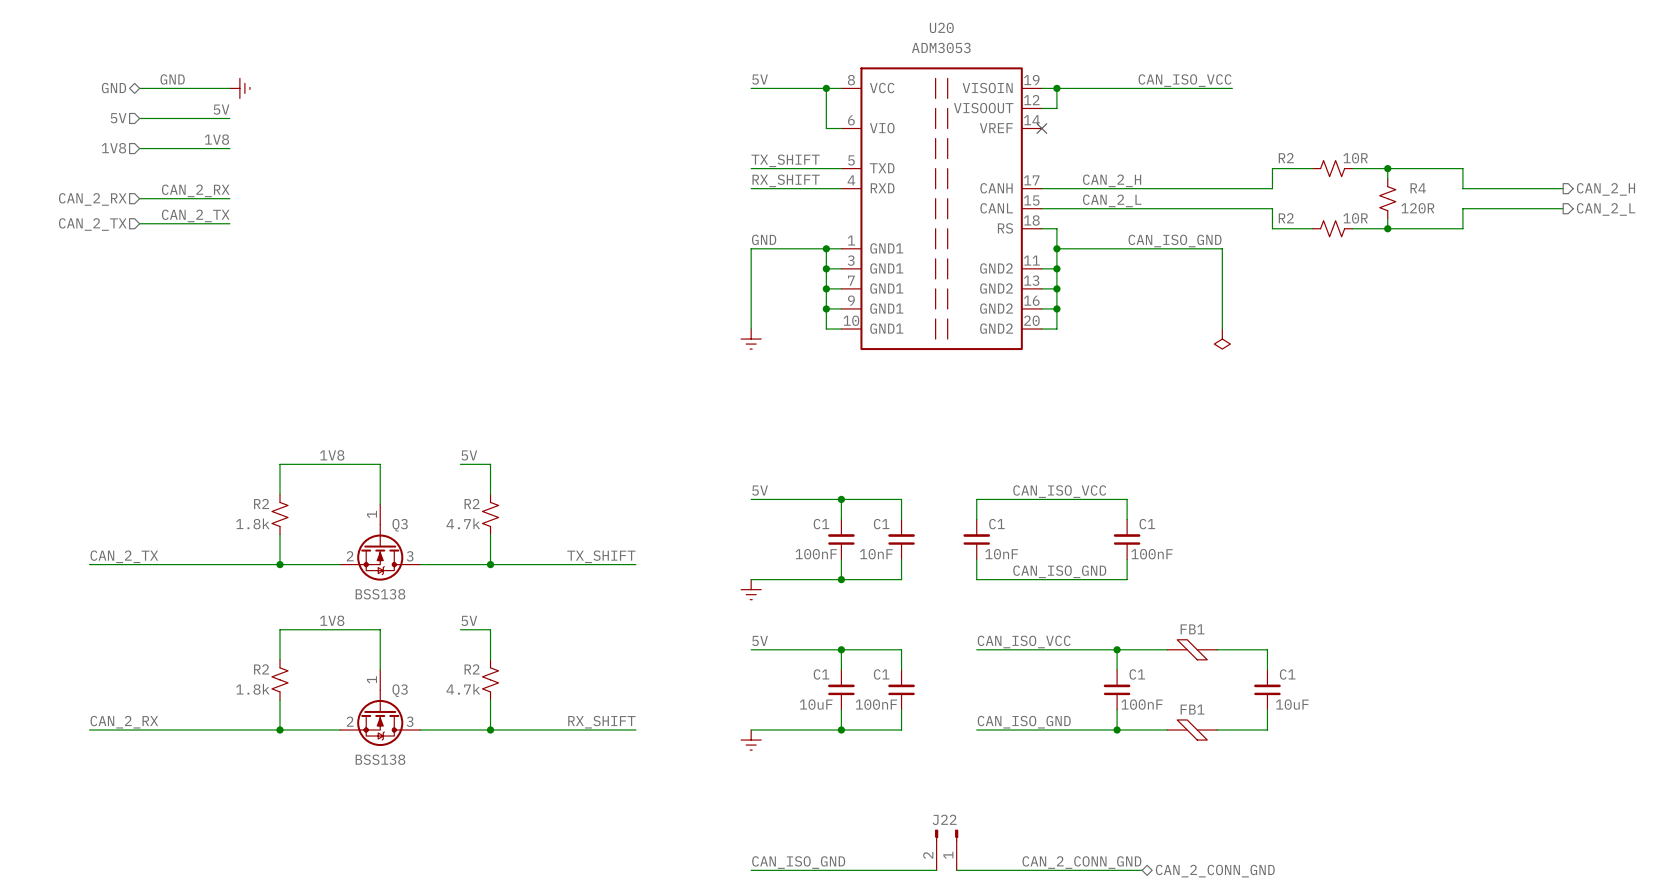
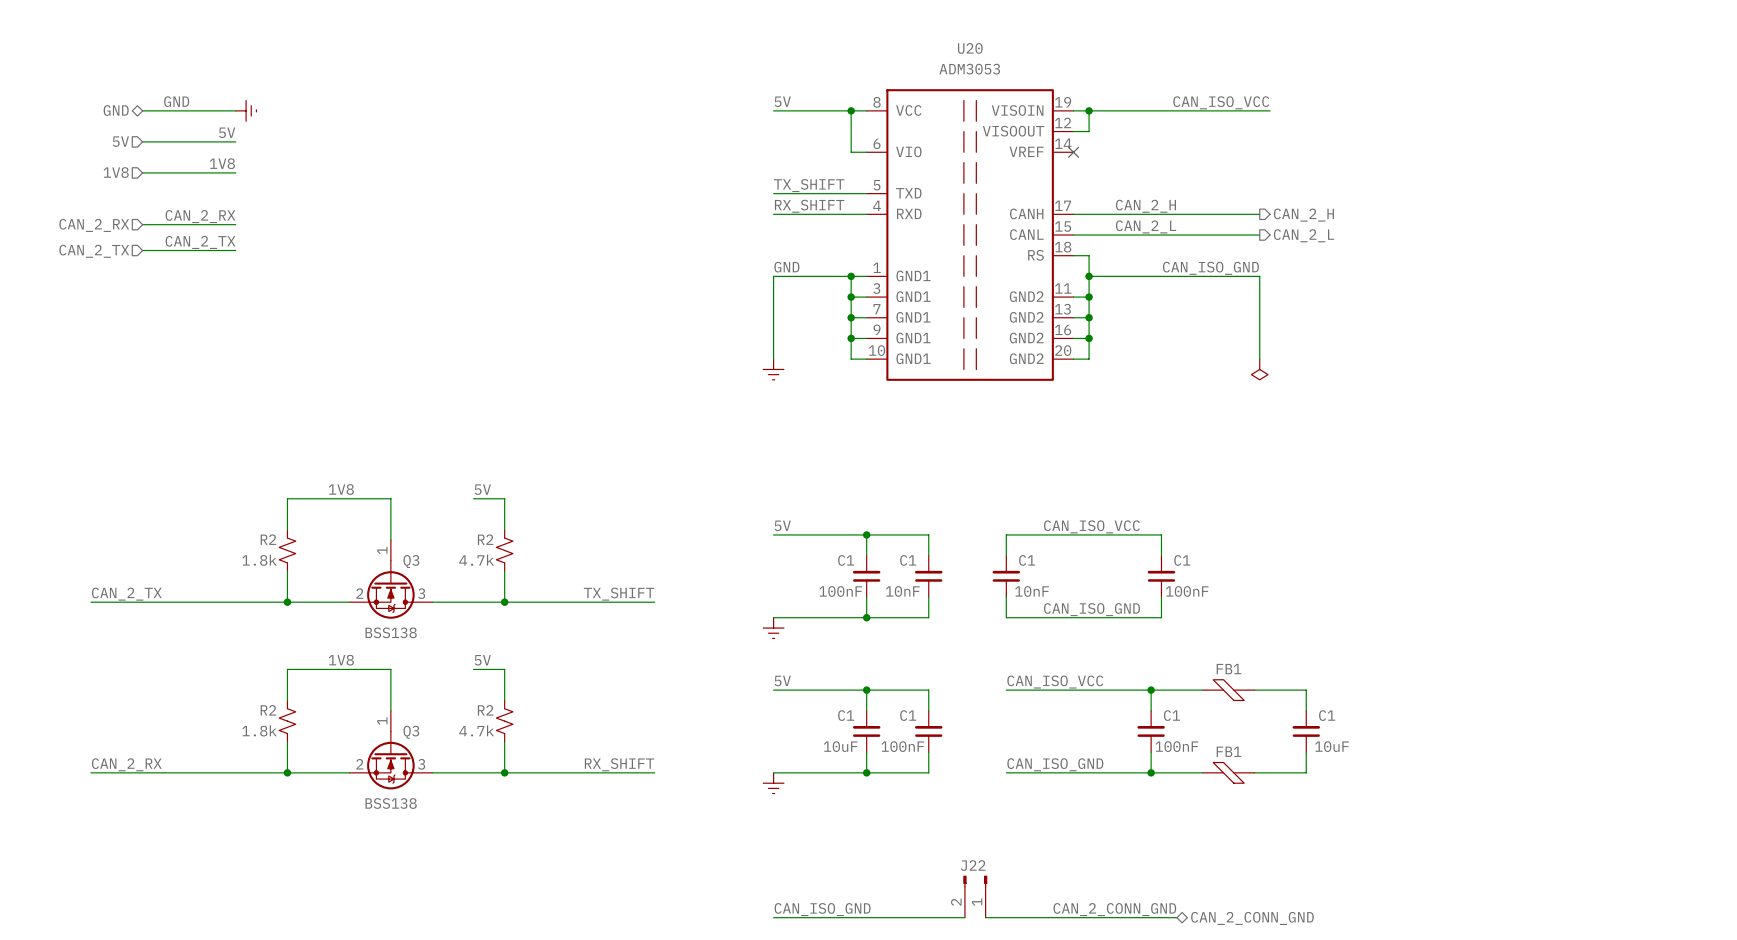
wire: (1312, 168) (1272, 168) (1272, 188) (1222, 188) -> none
R2: 10R (1332, 168) -> none
wire: (1352, 168) (1462, 168) (1462, 188) (1563, 188) -> none
wire: (1387, 168) (1387, 178) -> none
junction: (1387, 168) -> none
hierarchical label: none -> CAN_2_H (1303, 215)
hierarchical label: CAN_2_H (1606, 189) -> none
R4: 120R (1387, 198) -> none
wire: (1222, 208) (1272, 208) (1272, 228) (1312, 228) -> none
wire: (1563, 208) (1462, 208) (1462, 228) (1352, 228) -> none
hierarchical label: none -> CAN_2_L (1304, 235)
hierarchical label: CAN_2_L (1606, 209) -> none
wire: (1387, 218) (1387, 228) -> none
R2: 10R (1332, 228) -> none
junction: (1387, 228) -> none

